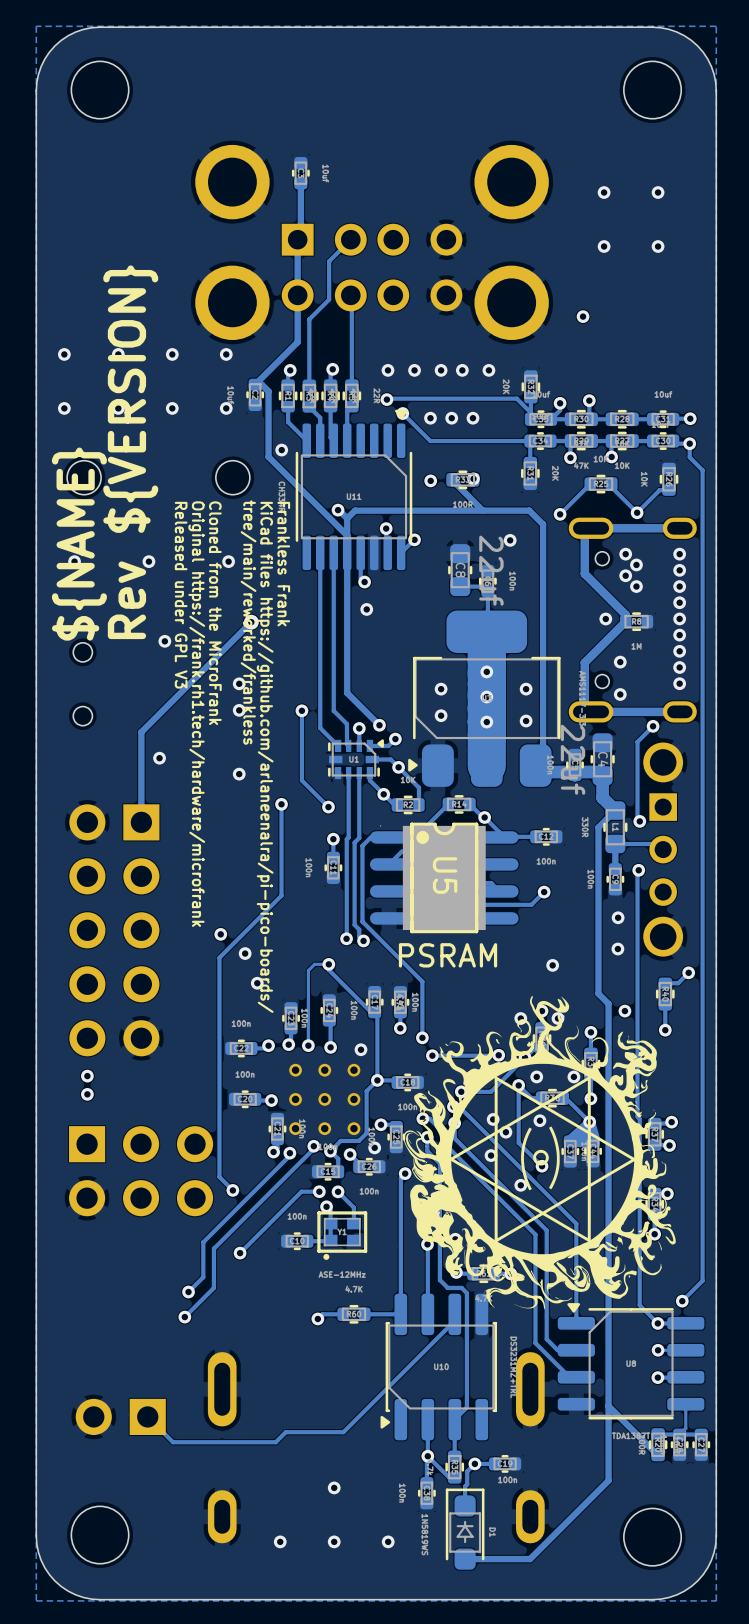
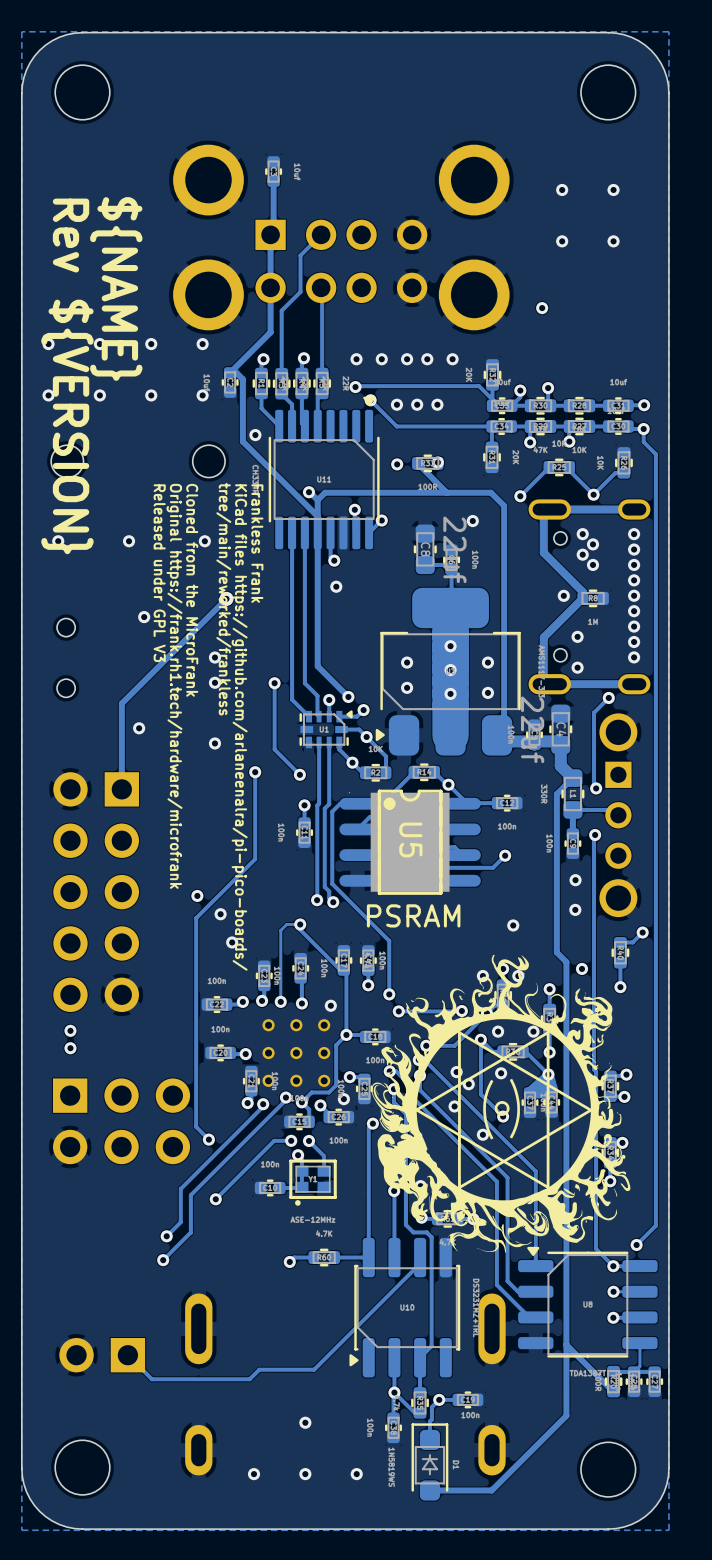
text rotation: 0° (130, 452) -> 180° (67, 376)
text rotation: 0° (79, 544) -> 180° (116, 288)

